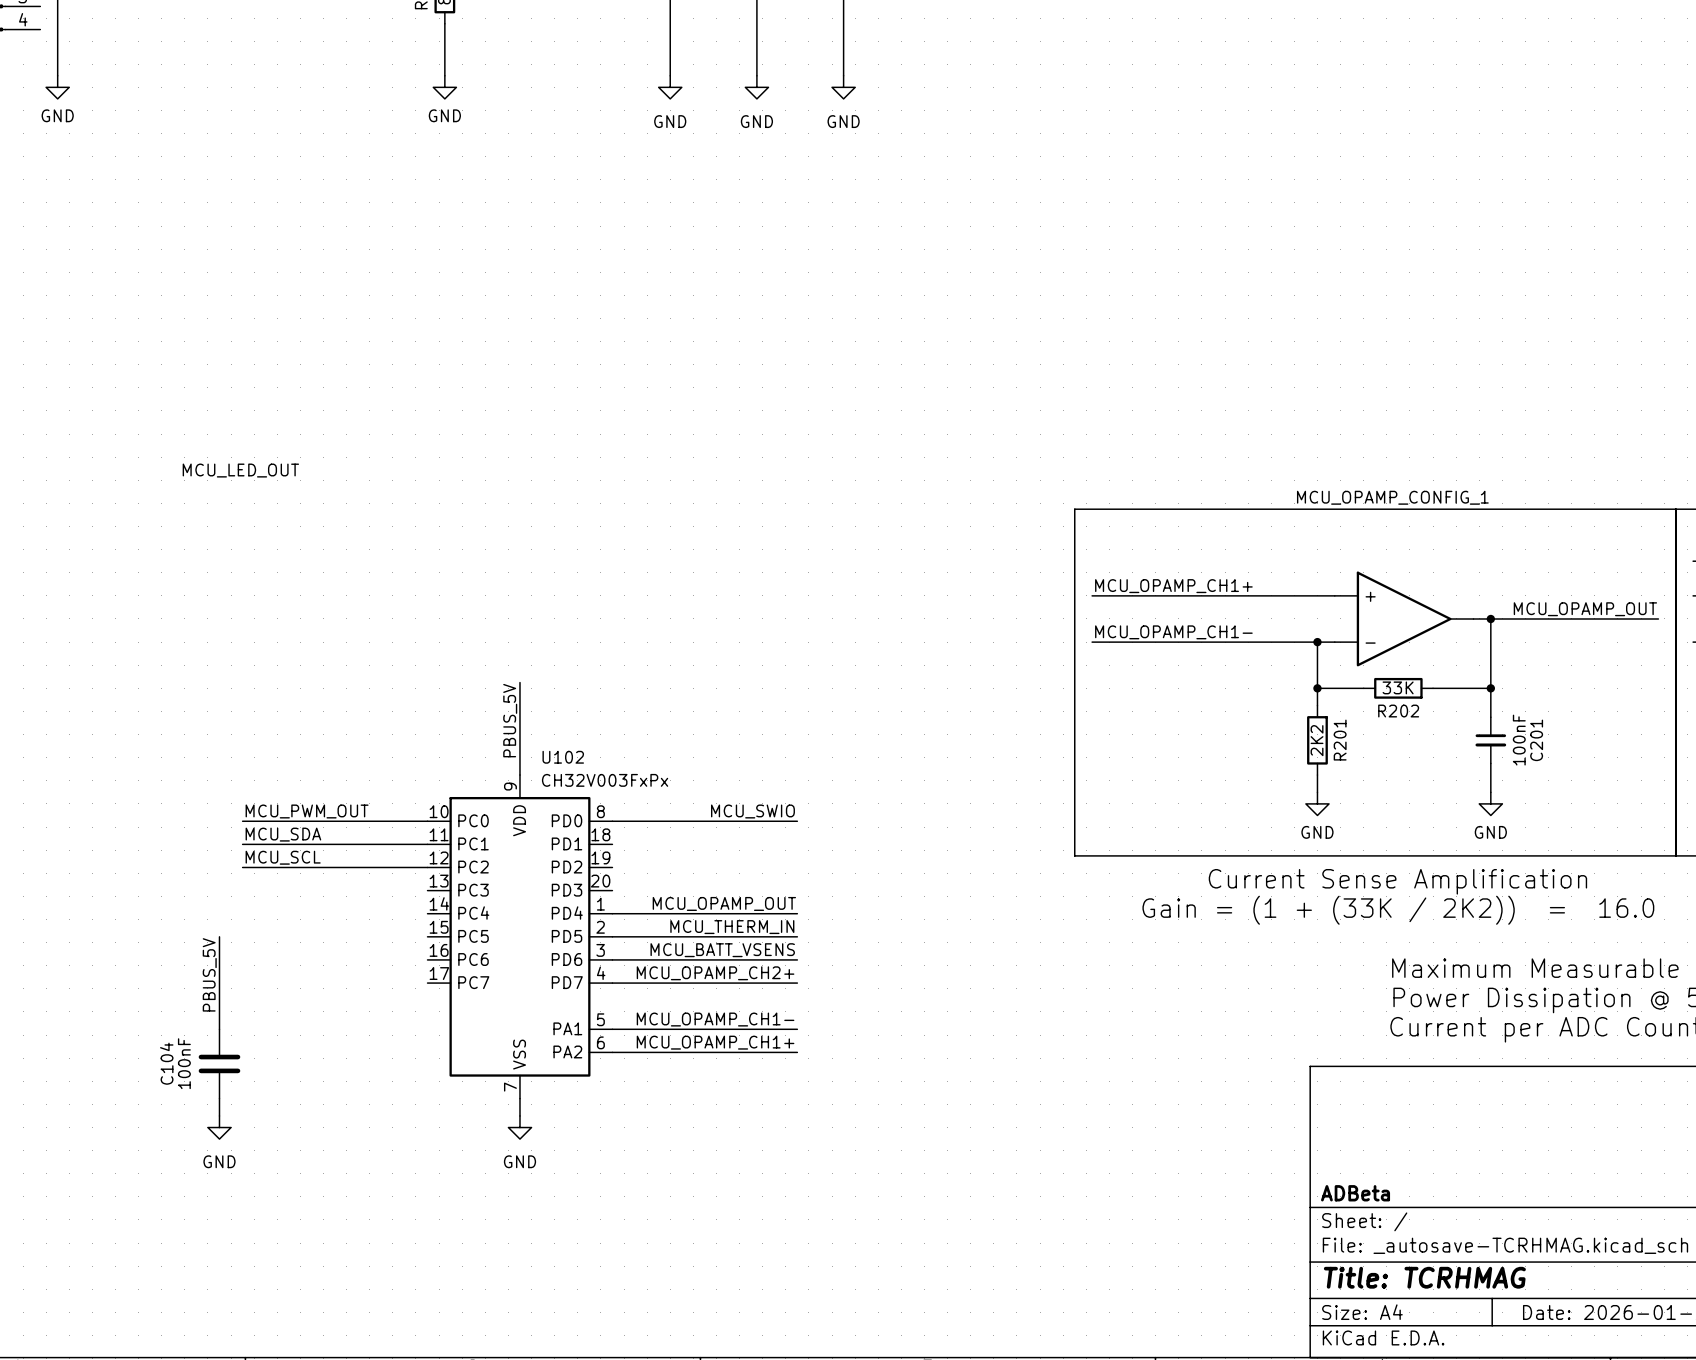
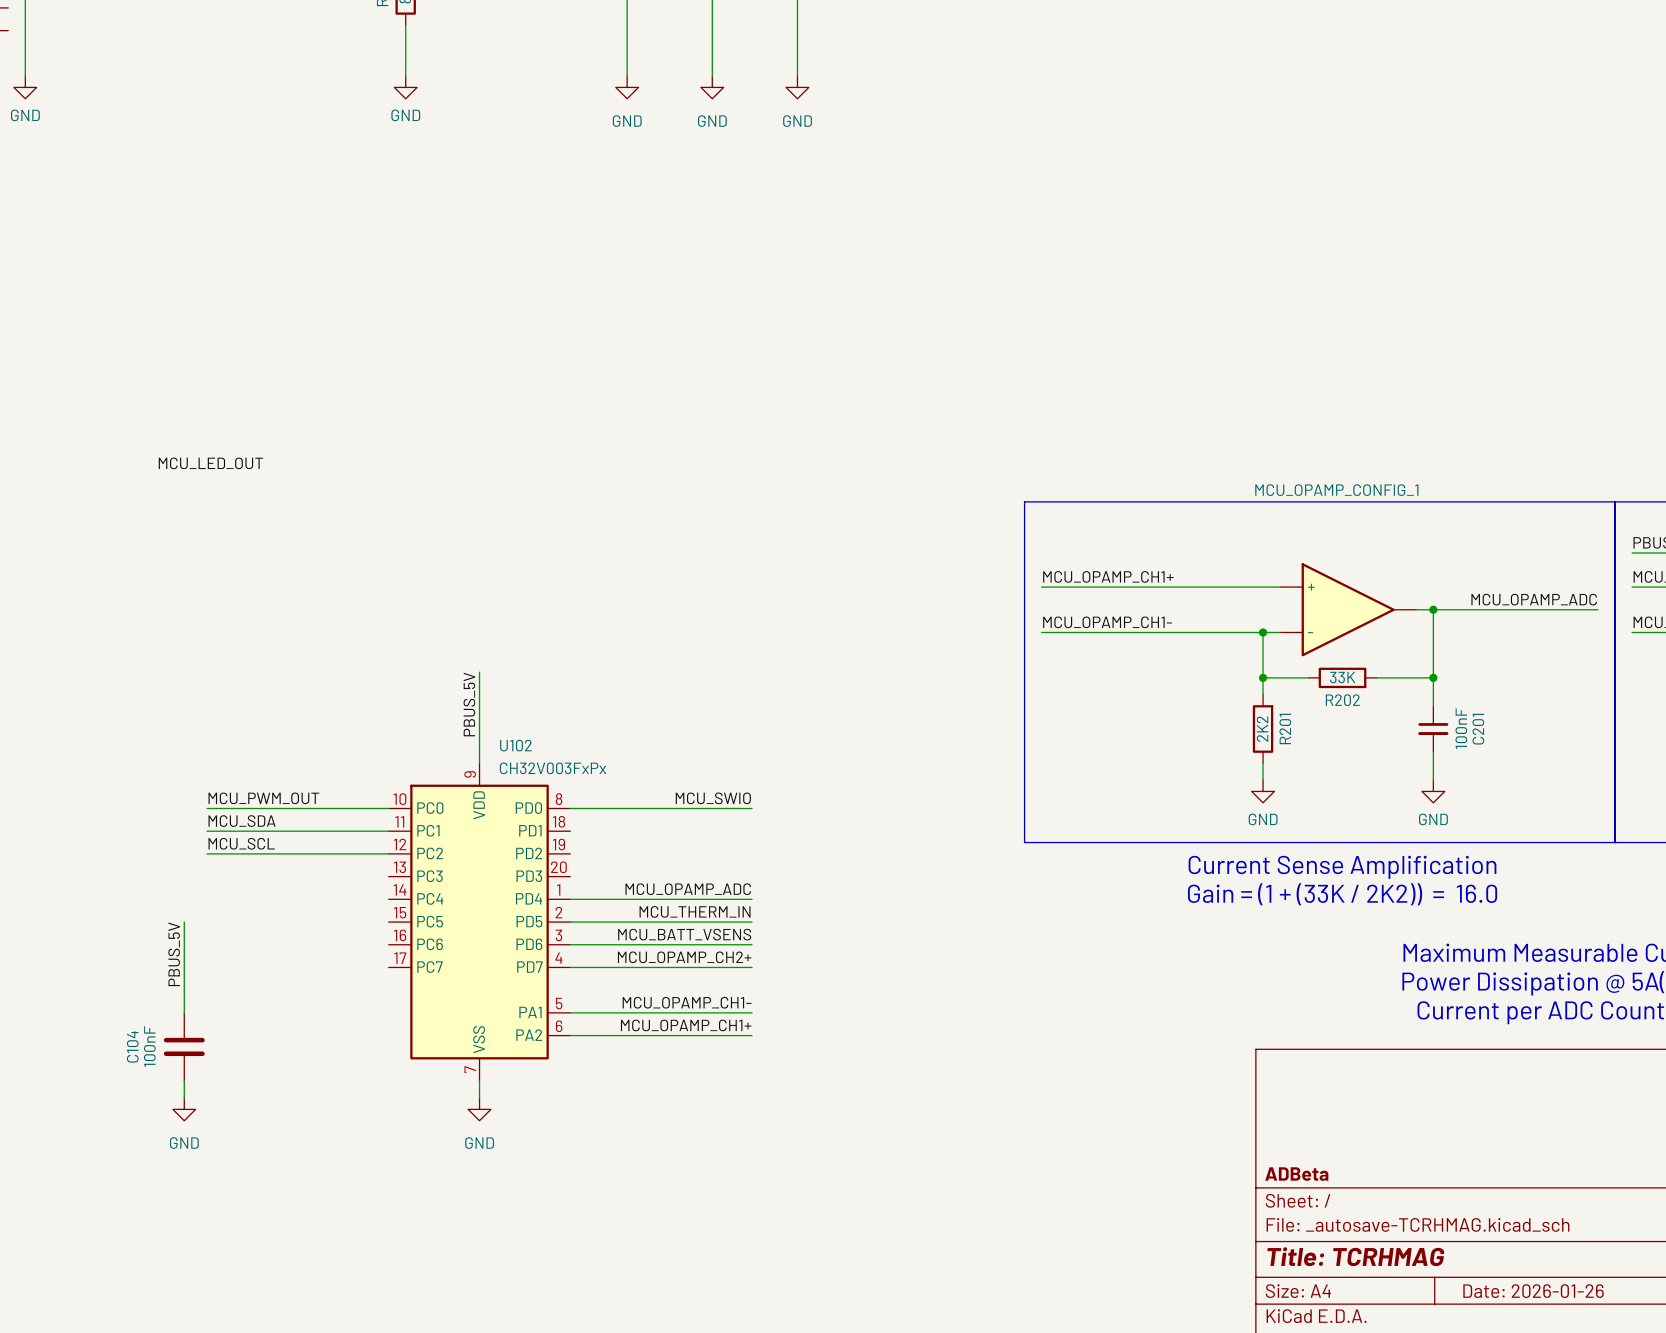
label: MCU_OPAMP_OUT (1585, 609) -> MCU_OPAMP_ADC (1534, 599)
label: MCU_OPAMP_OUT (724, 903) -> MCU_OPAMP_ADC (688, 889)

